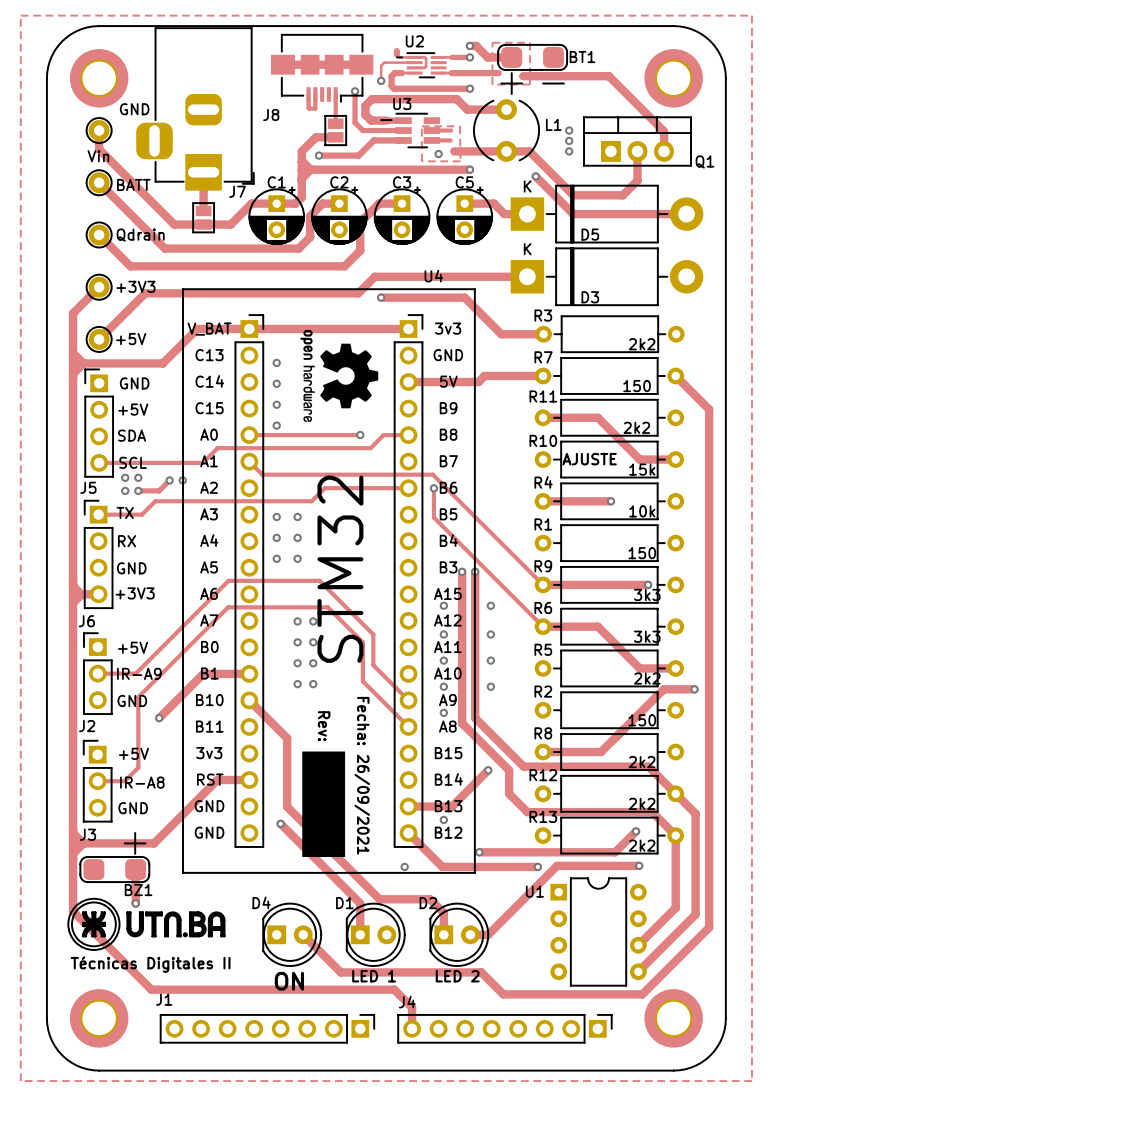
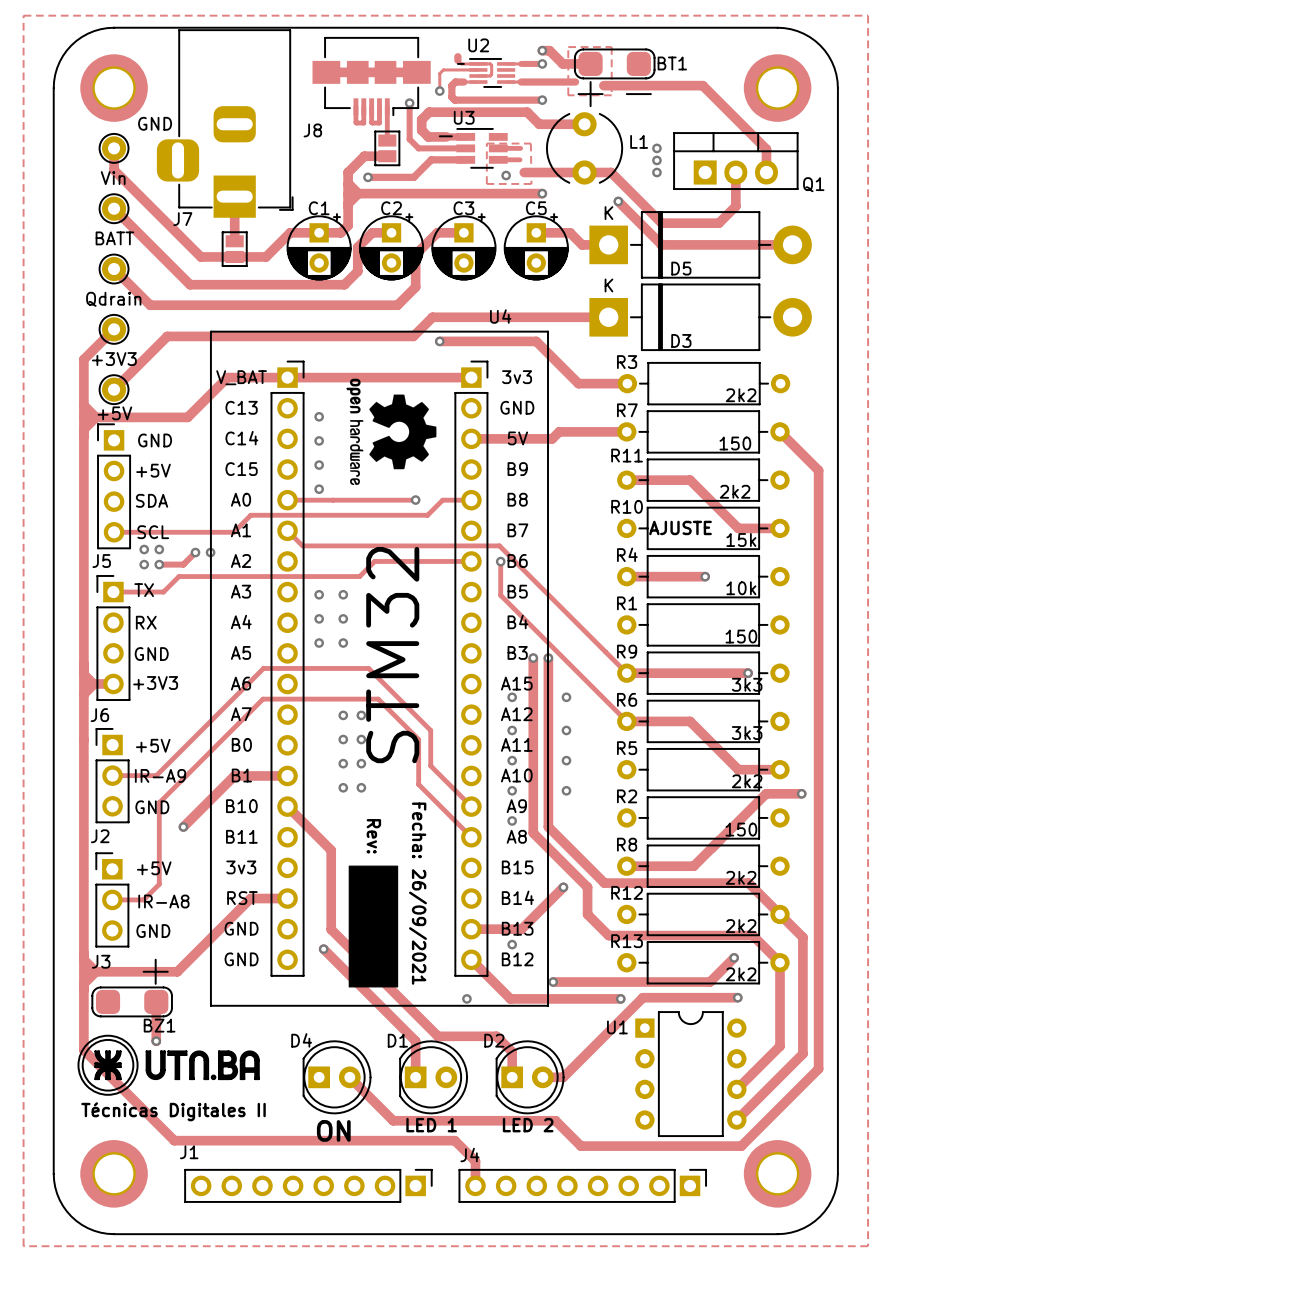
track: none -> (371, 106) (372, 123) (379, 123) (379, 106)
BATT name position: BATT (133, 184) -> BATT (114, 238)
J7 name position: J7 (237, 191) -> J7 (182, 219)
Qdrain name position: Qdrain (140, 235) -> Qdrain (113, 299)
+3V3 name position: +3V3 (135, 286) -> +3V3 (114, 359)
+5V name position: +5V (131, 339) -> +5V (114, 413)

